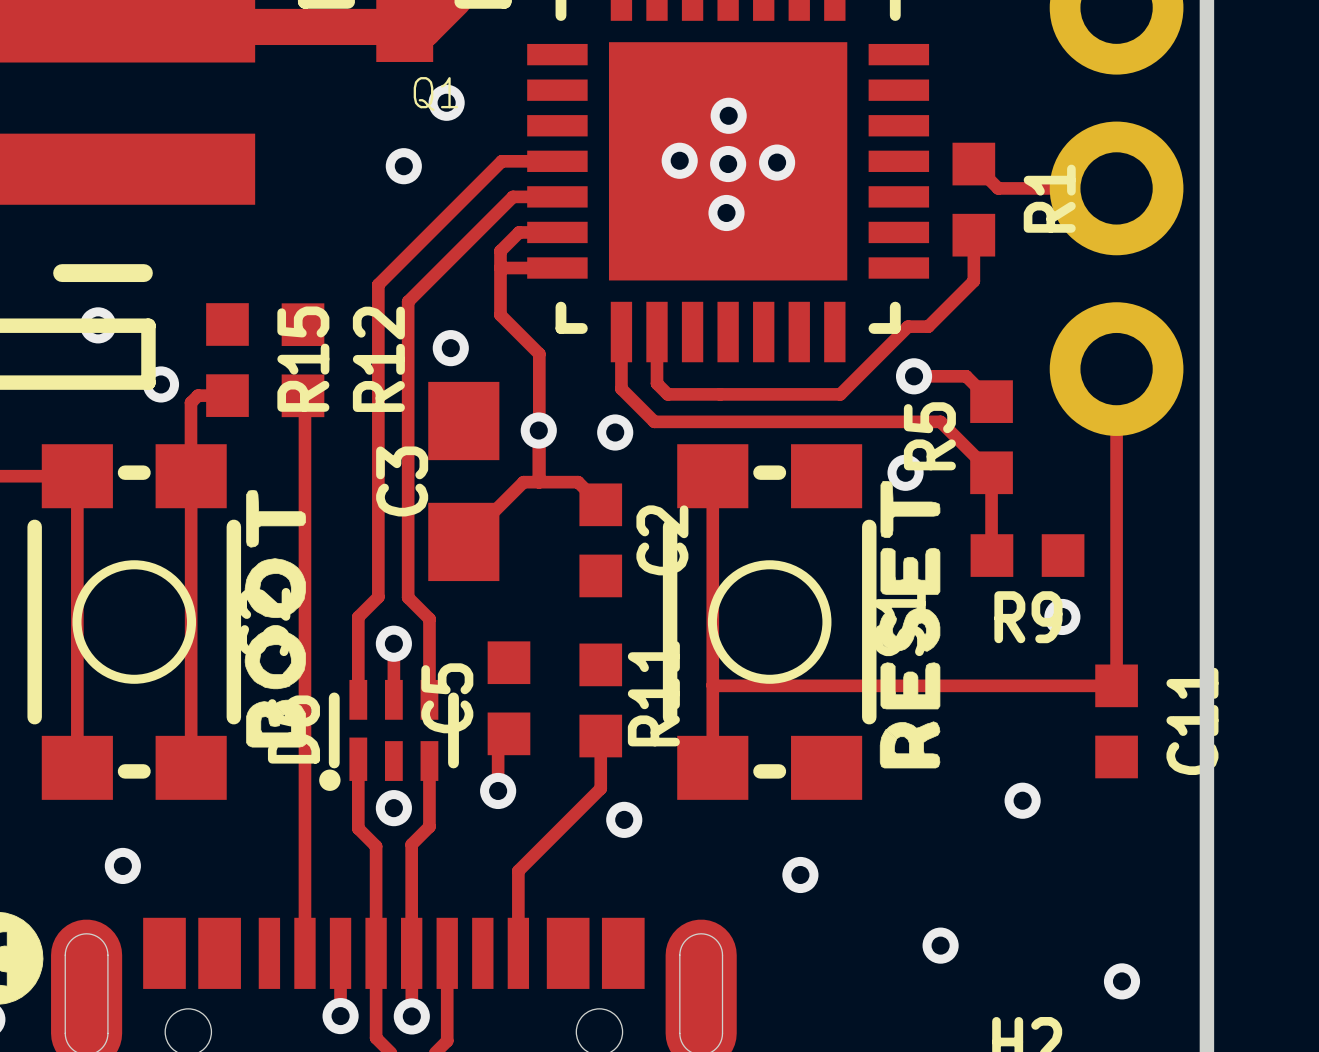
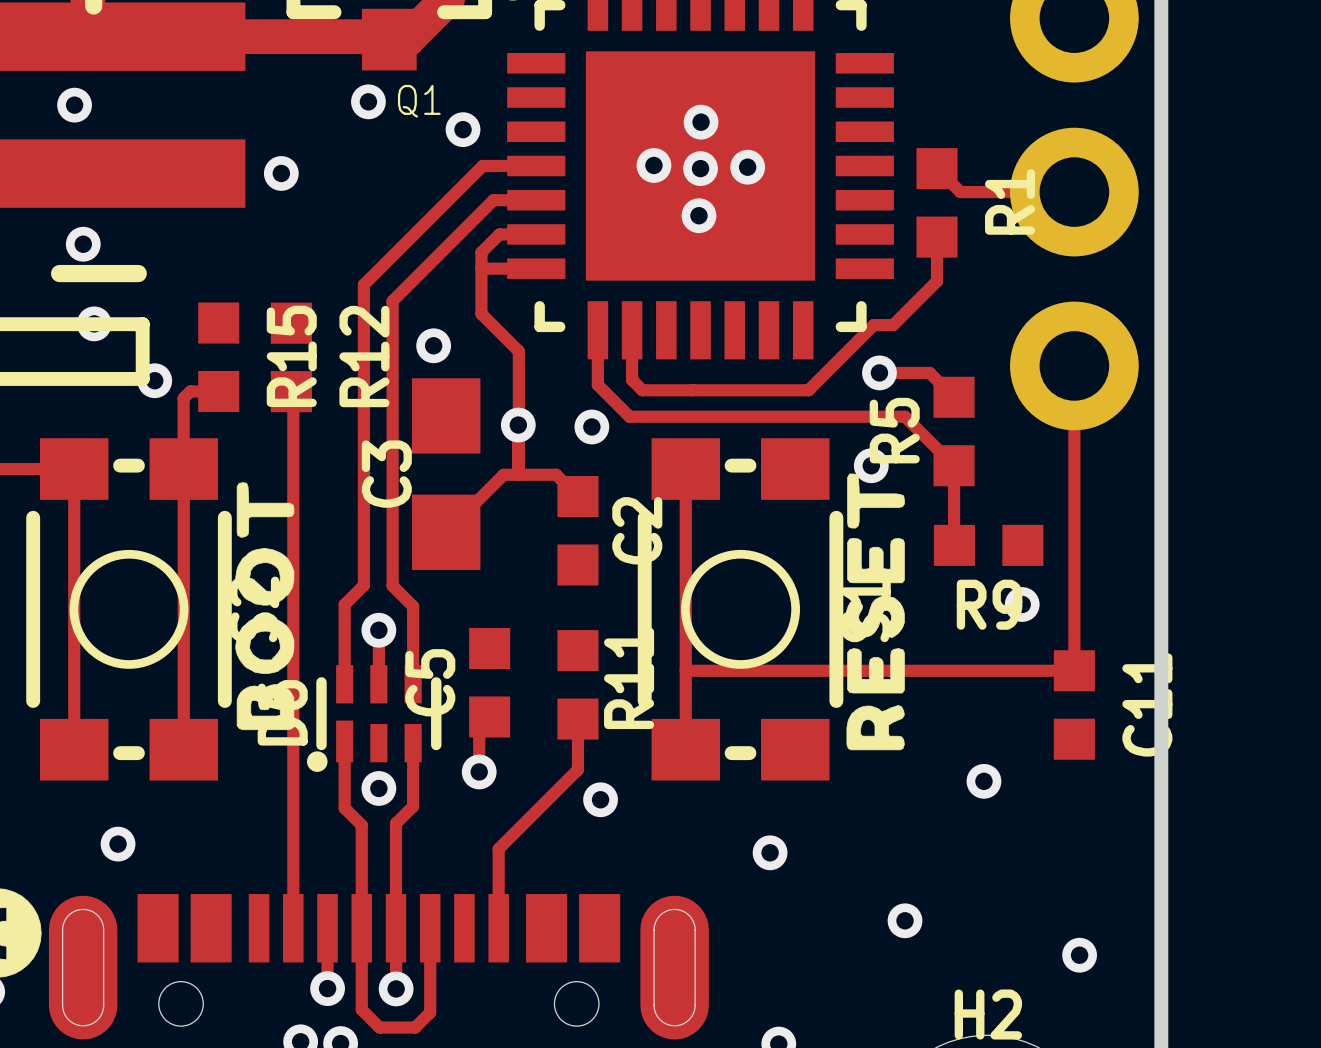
via: none -> (368, 101)
via: none -> (74, 105)
via position: (446, 102) -> (463, 129)
via: (403, 166) -> none
via: none -> (281, 173)
via: none -> (83, 244)

